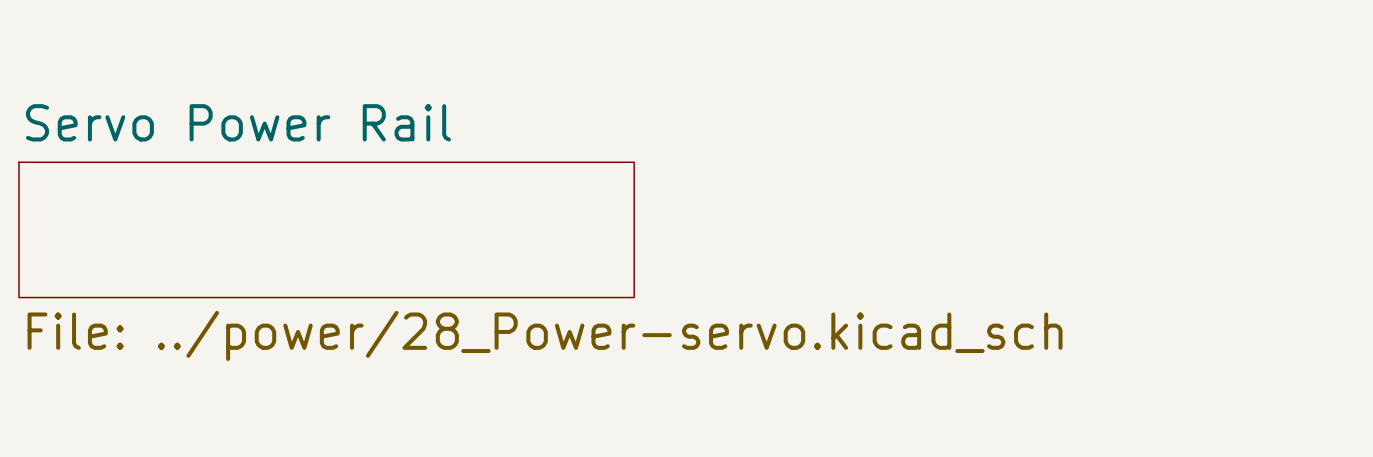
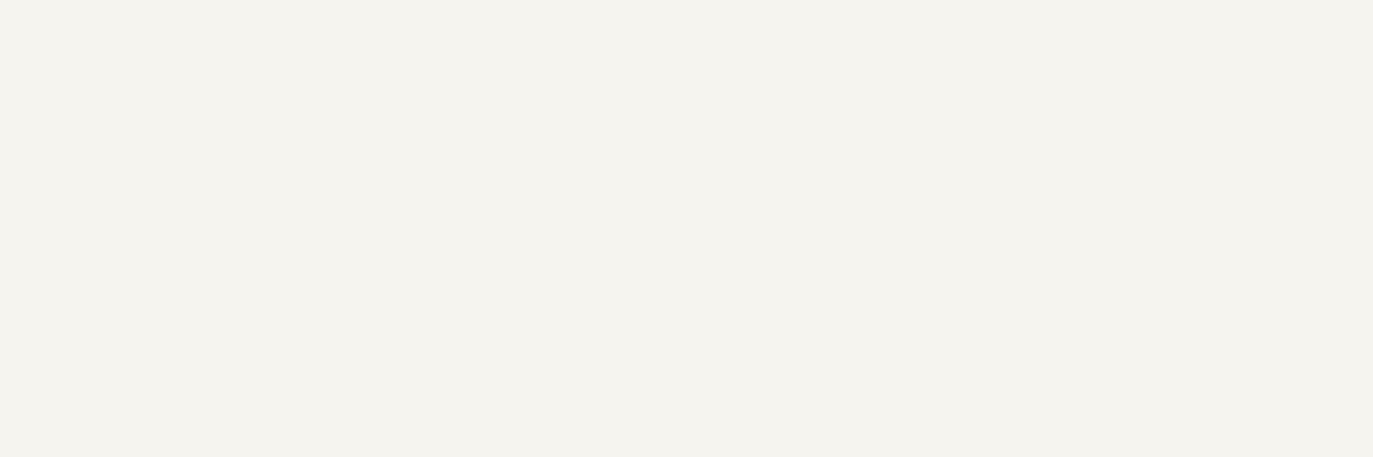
sheet Servo Power Rail: File: ../power/28_Power-servo.kicad_sch (326, 229) -> none

